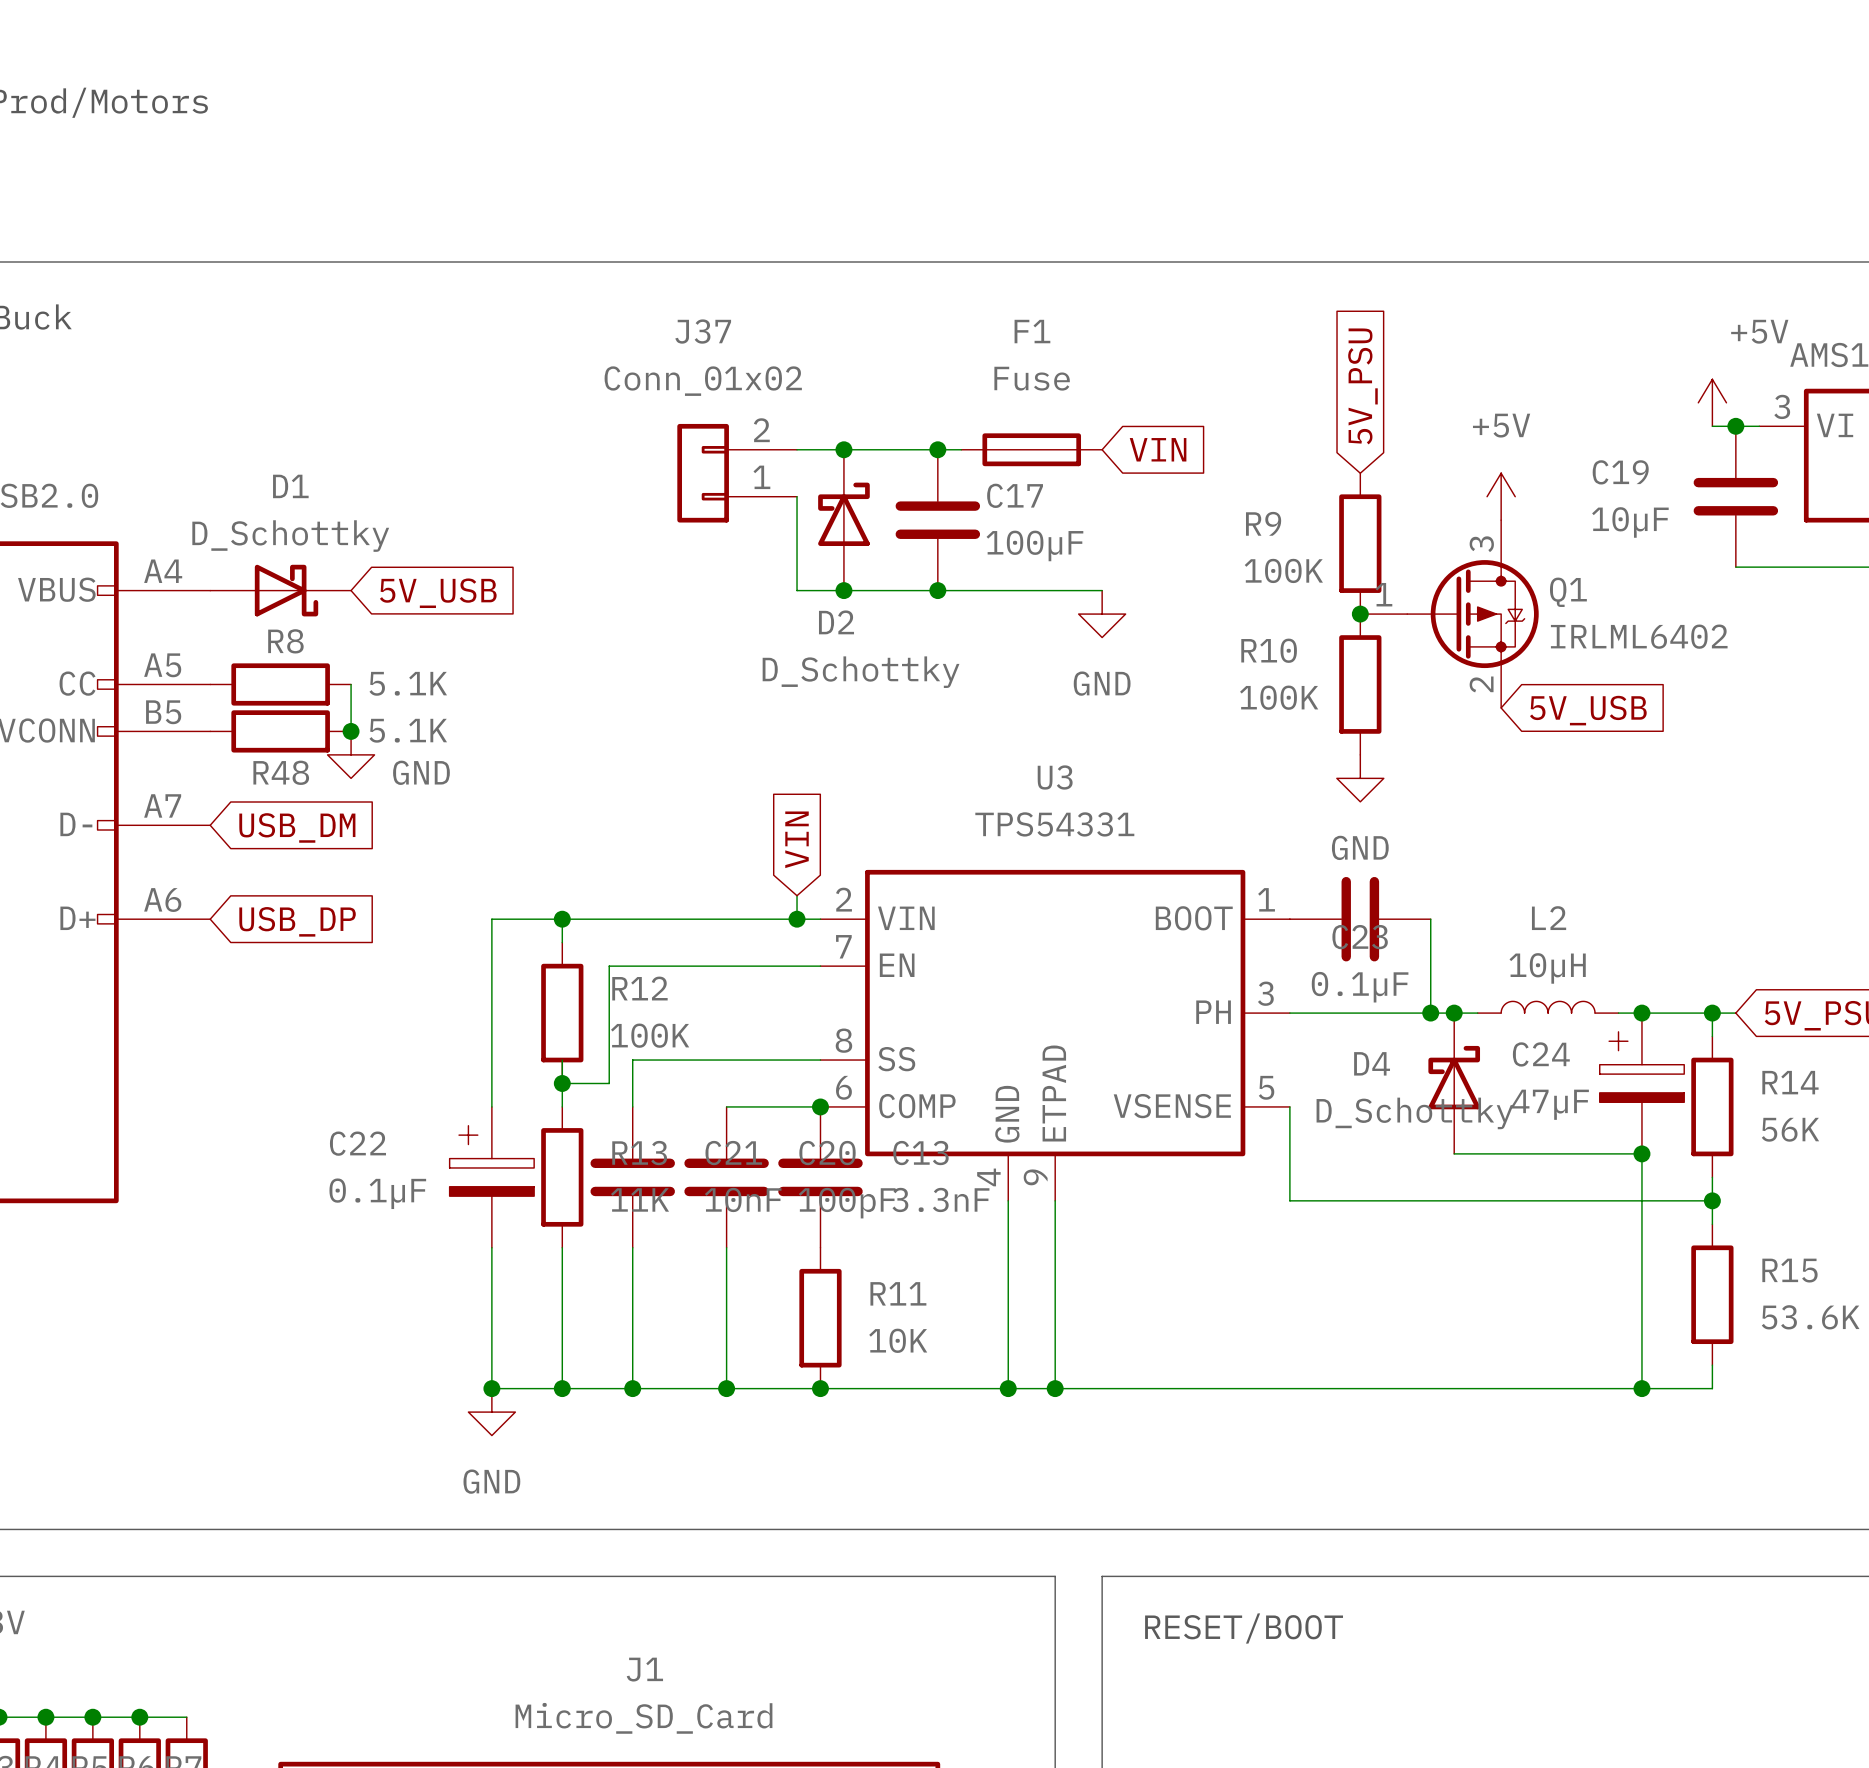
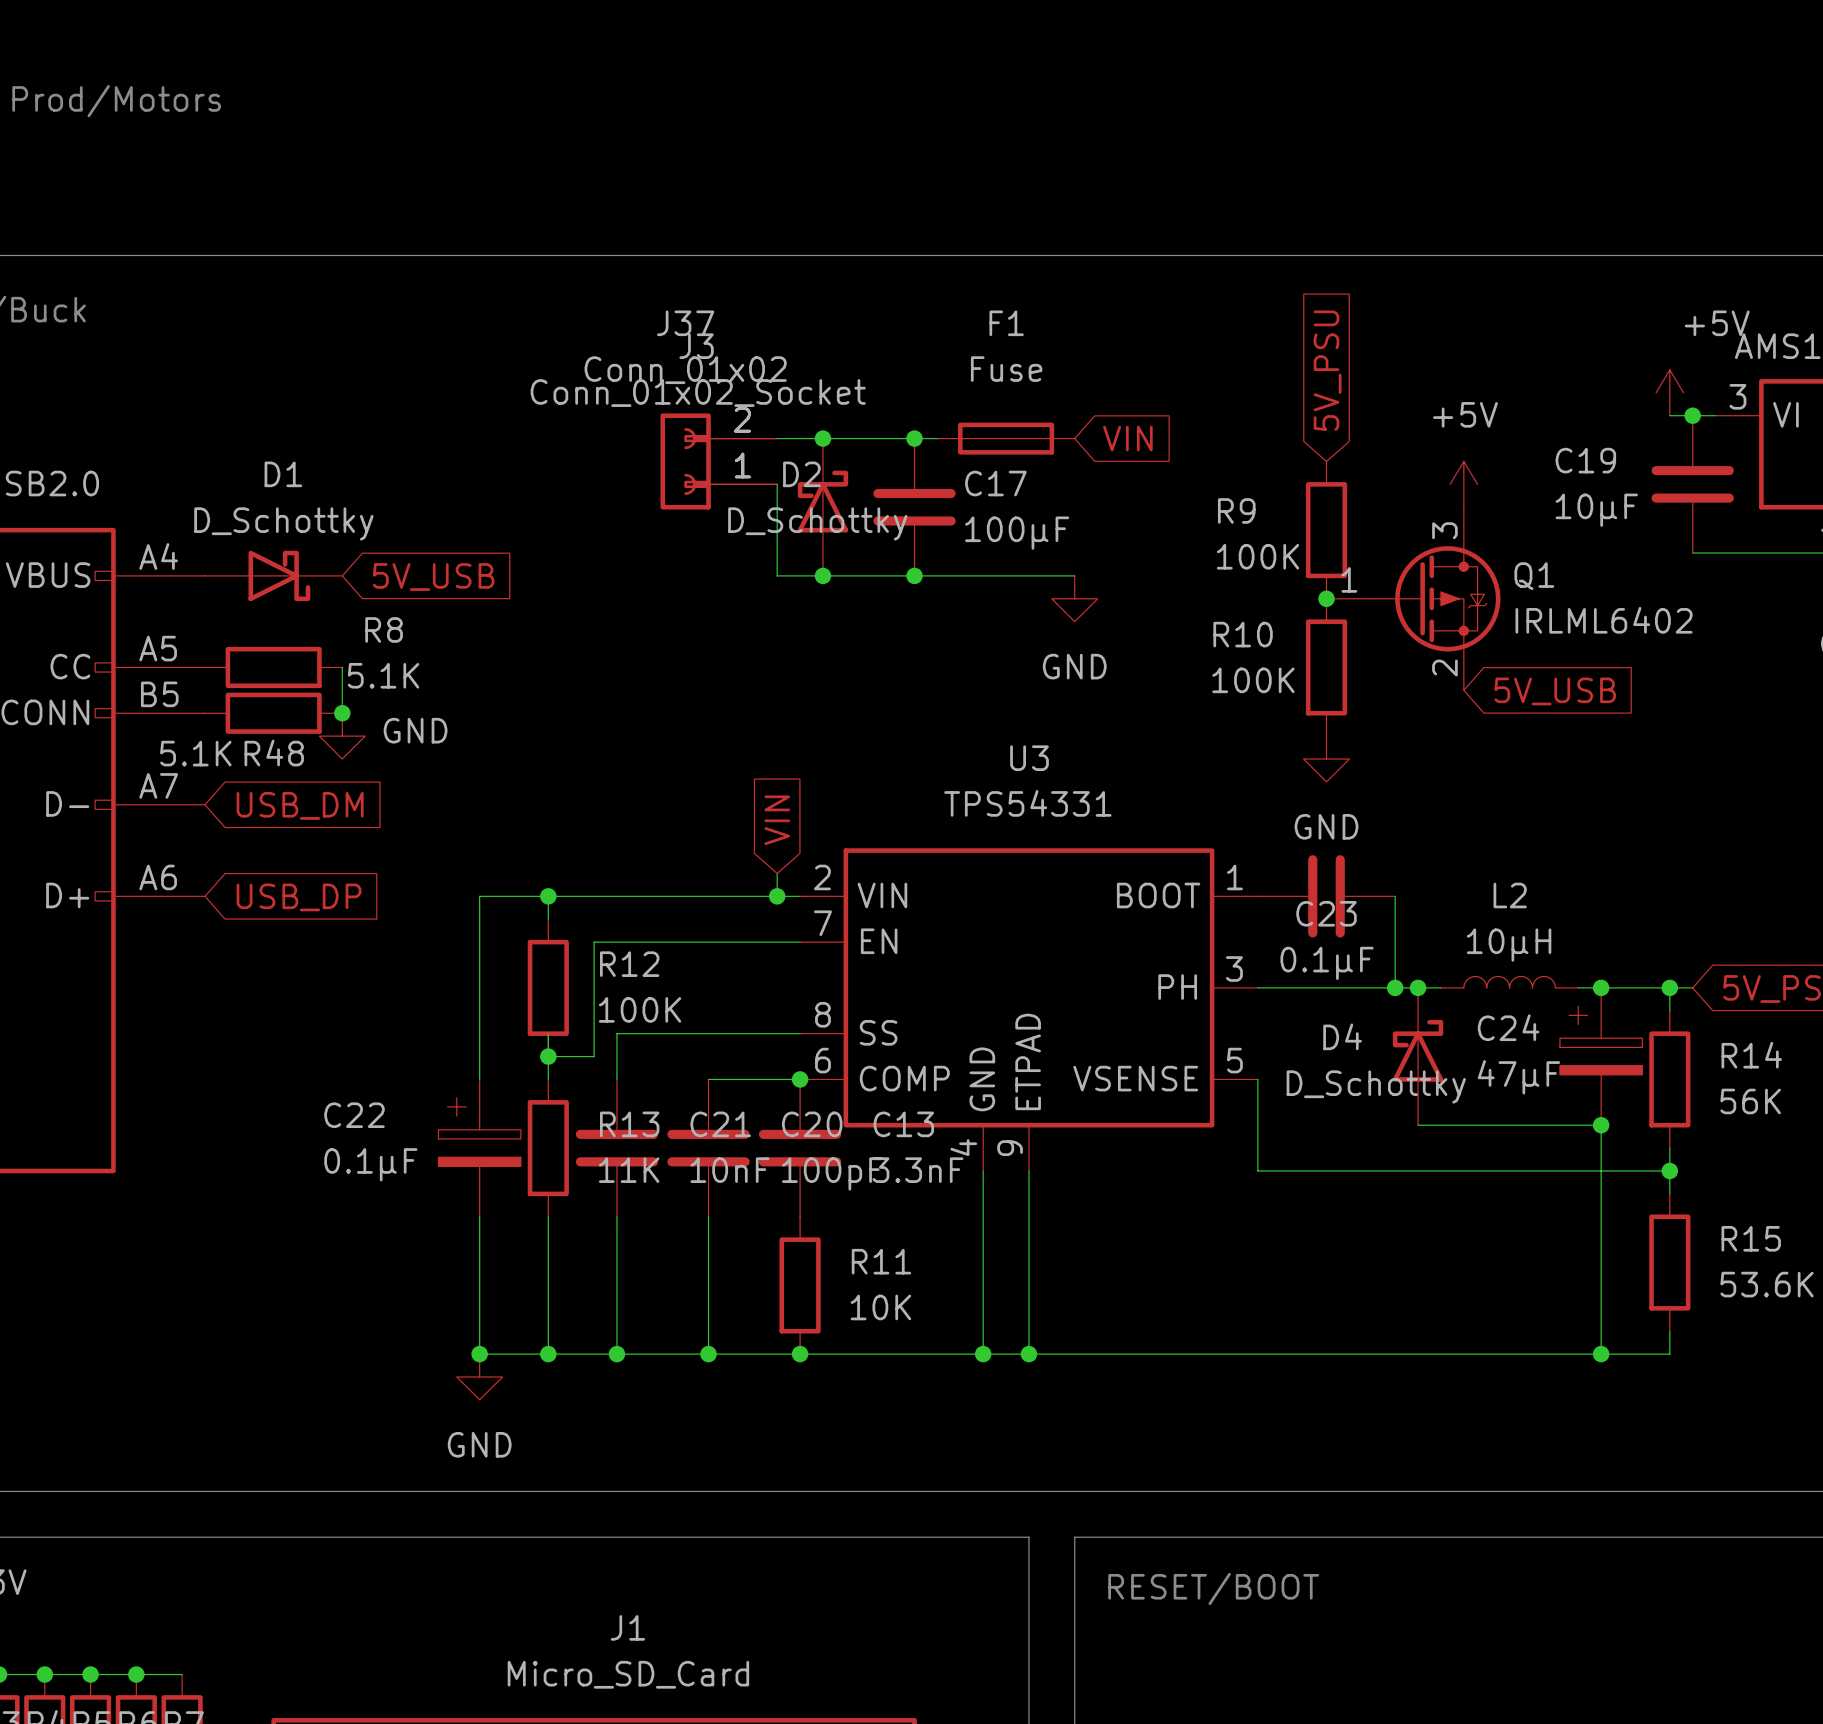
J3: none -> Conn_01x02_Socket (730, 461)
D2 name position: D2 (836, 622) -> D2 (801, 474)
R8 name position: R8 (285, 641) -> R8 (384, 629)
D2 value position: D_Schottky (861, 672) -> D_Schottky (817, 523)
R8 value position: 5.1K (408, 683) -> 5.1K (383, 675)
R48 value position: 5.1K (408, 730) -> 5.1K (195, 753)
power symbol text position: GND (421, 772) -> GND (415, 730)

